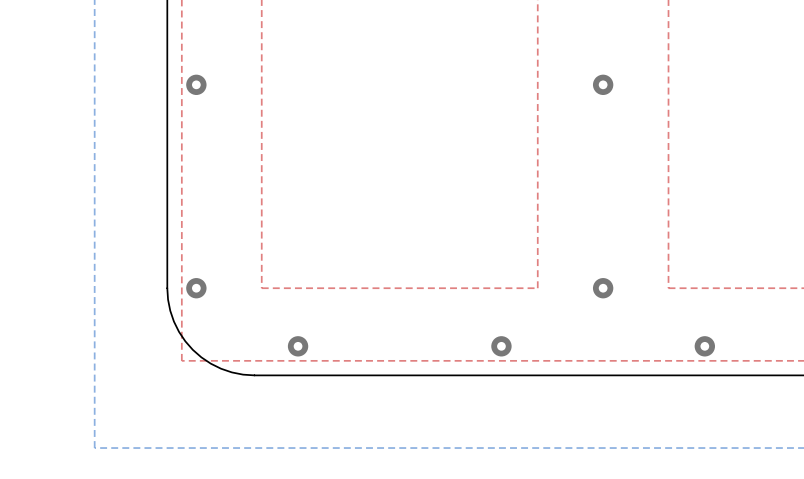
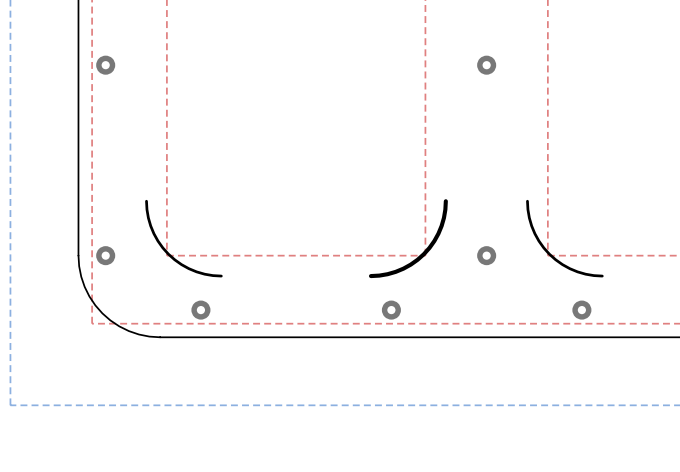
line: none -> (146, 201) (148, 217) (153, 233) (168, 254) (188, 268) (204, 274) (221, 276)
line: none -> (445, 201) (443, 217) (438, 233) (423, 254) (403, 268) (387, 274) (371, 276)
line: none -> (527, 201) (529, 217) (534, 233) (549, 254) (562, 264) (577, 271) (602, 276)

